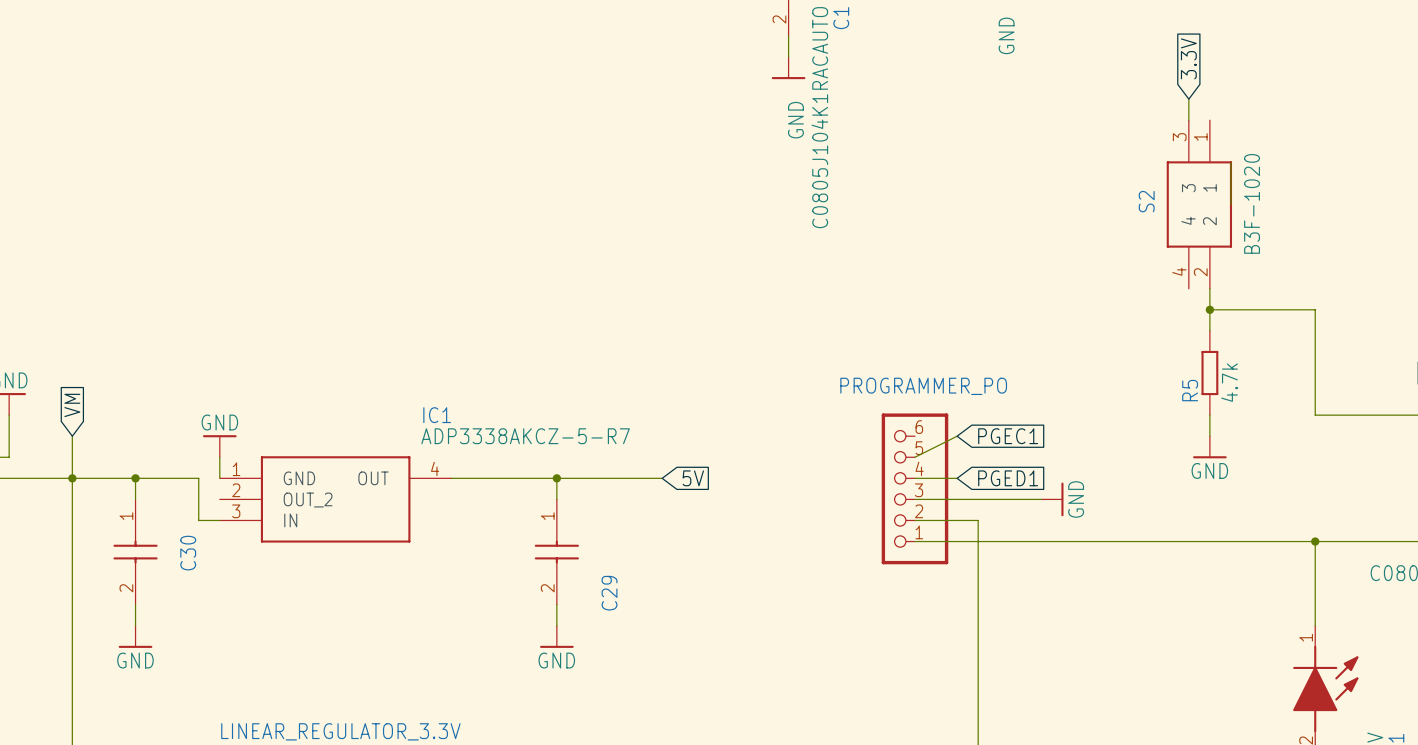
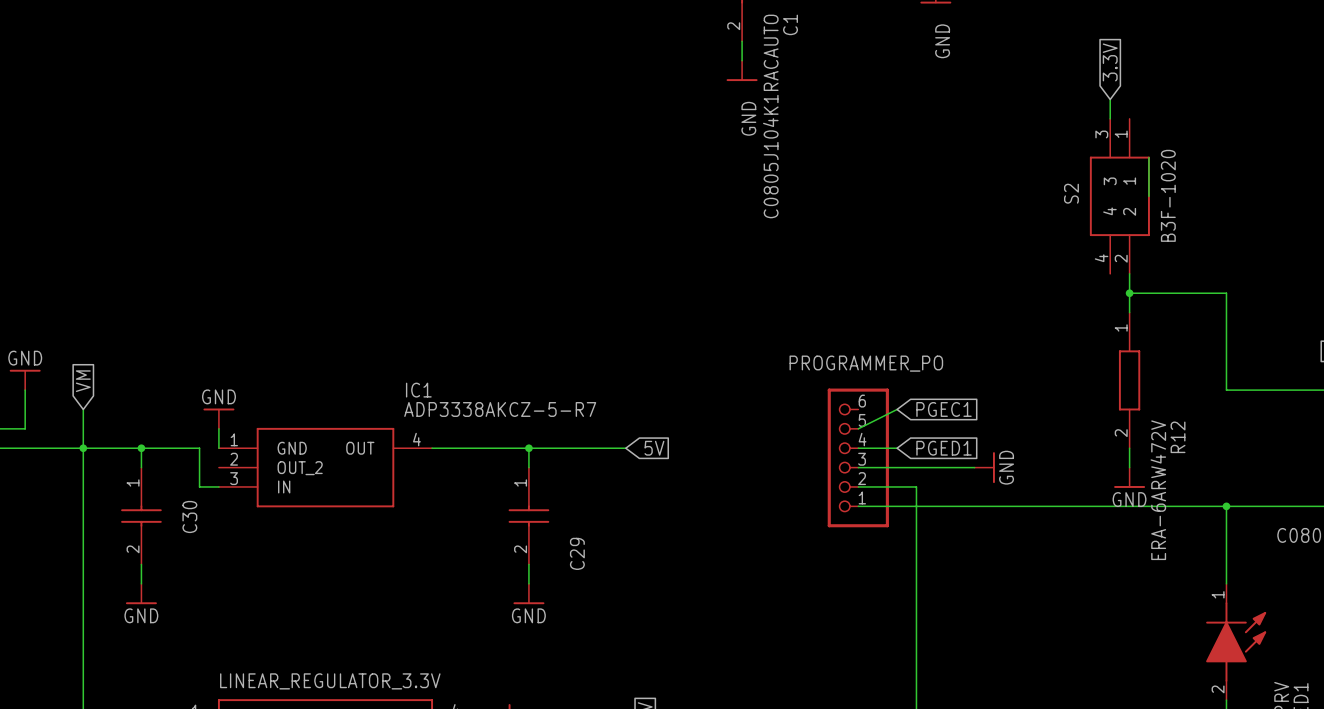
R5: 4.7k (1209, 373) -> none
R12: none -> ERA-6ARW472V (1129, 380)
wire: (1209, 415) (1209, 436) -> (1129, 448) (1129, 467)
power symbol position: GND (1209, 447) -> GND (1129, 477)

